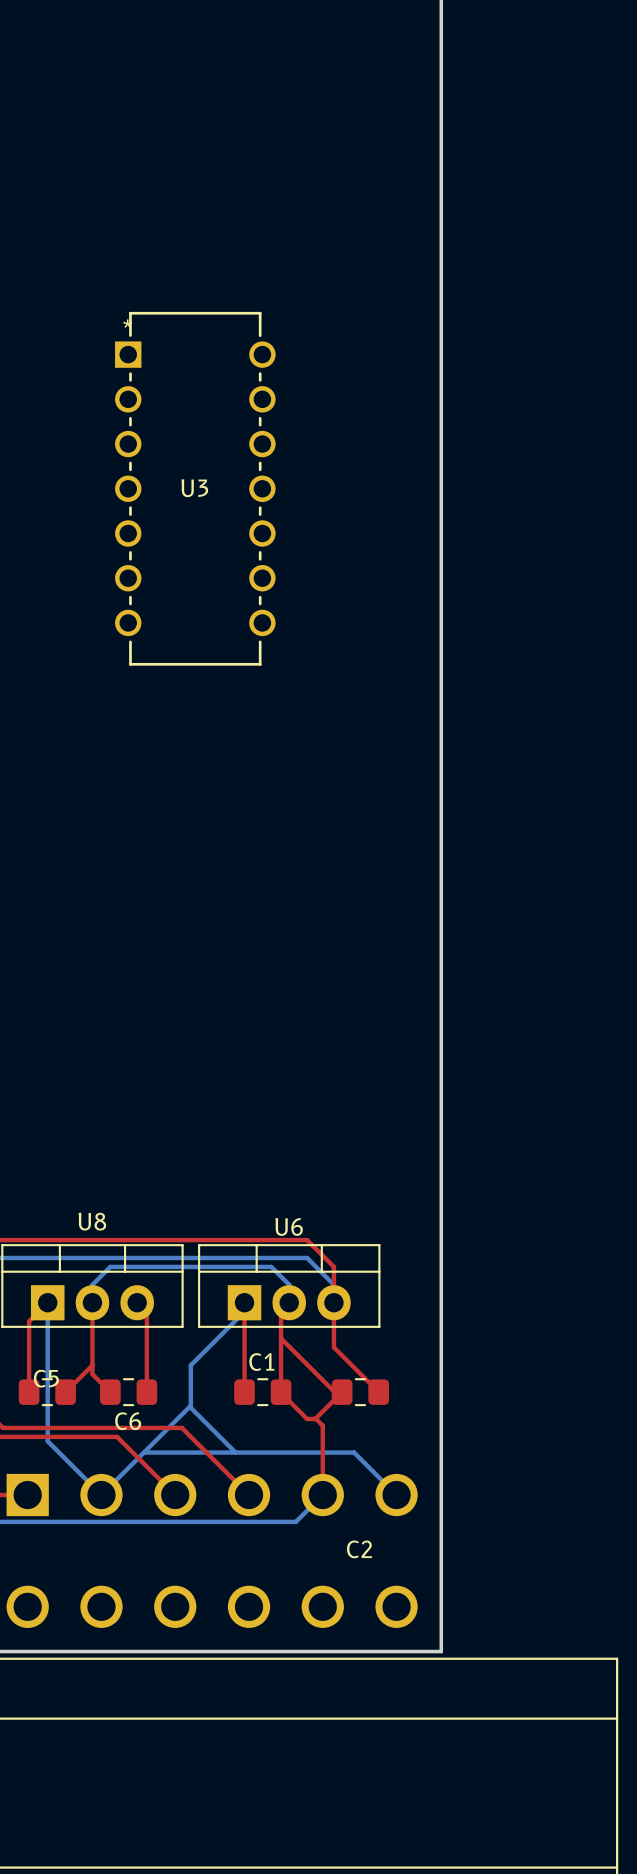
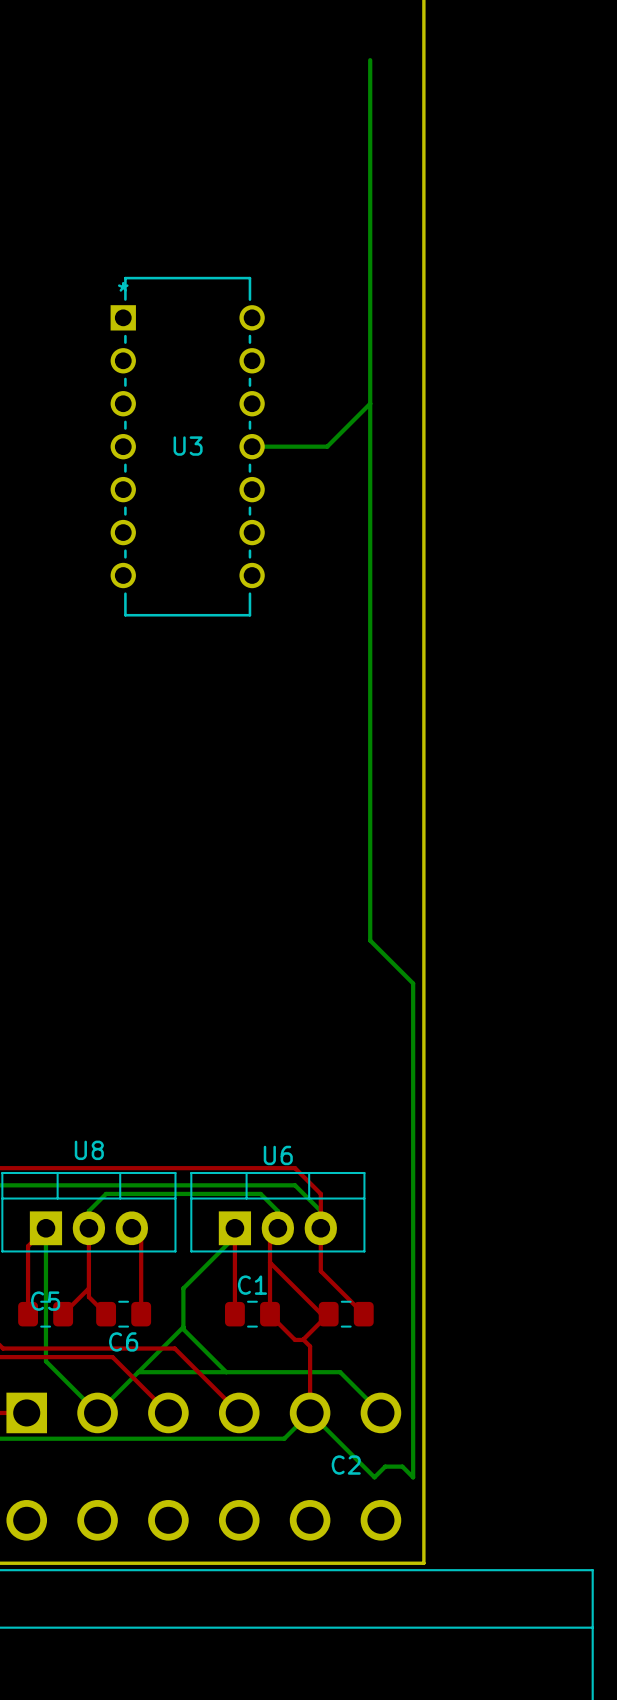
bottom track: none -> (370, 60) (370, 940) (413, 983) (413, 1477) (402, 1466) (385, 1466) (374, 1477) (310, 1412)
bottom track: none -> (370, 403) (327, 446) (252, 446)

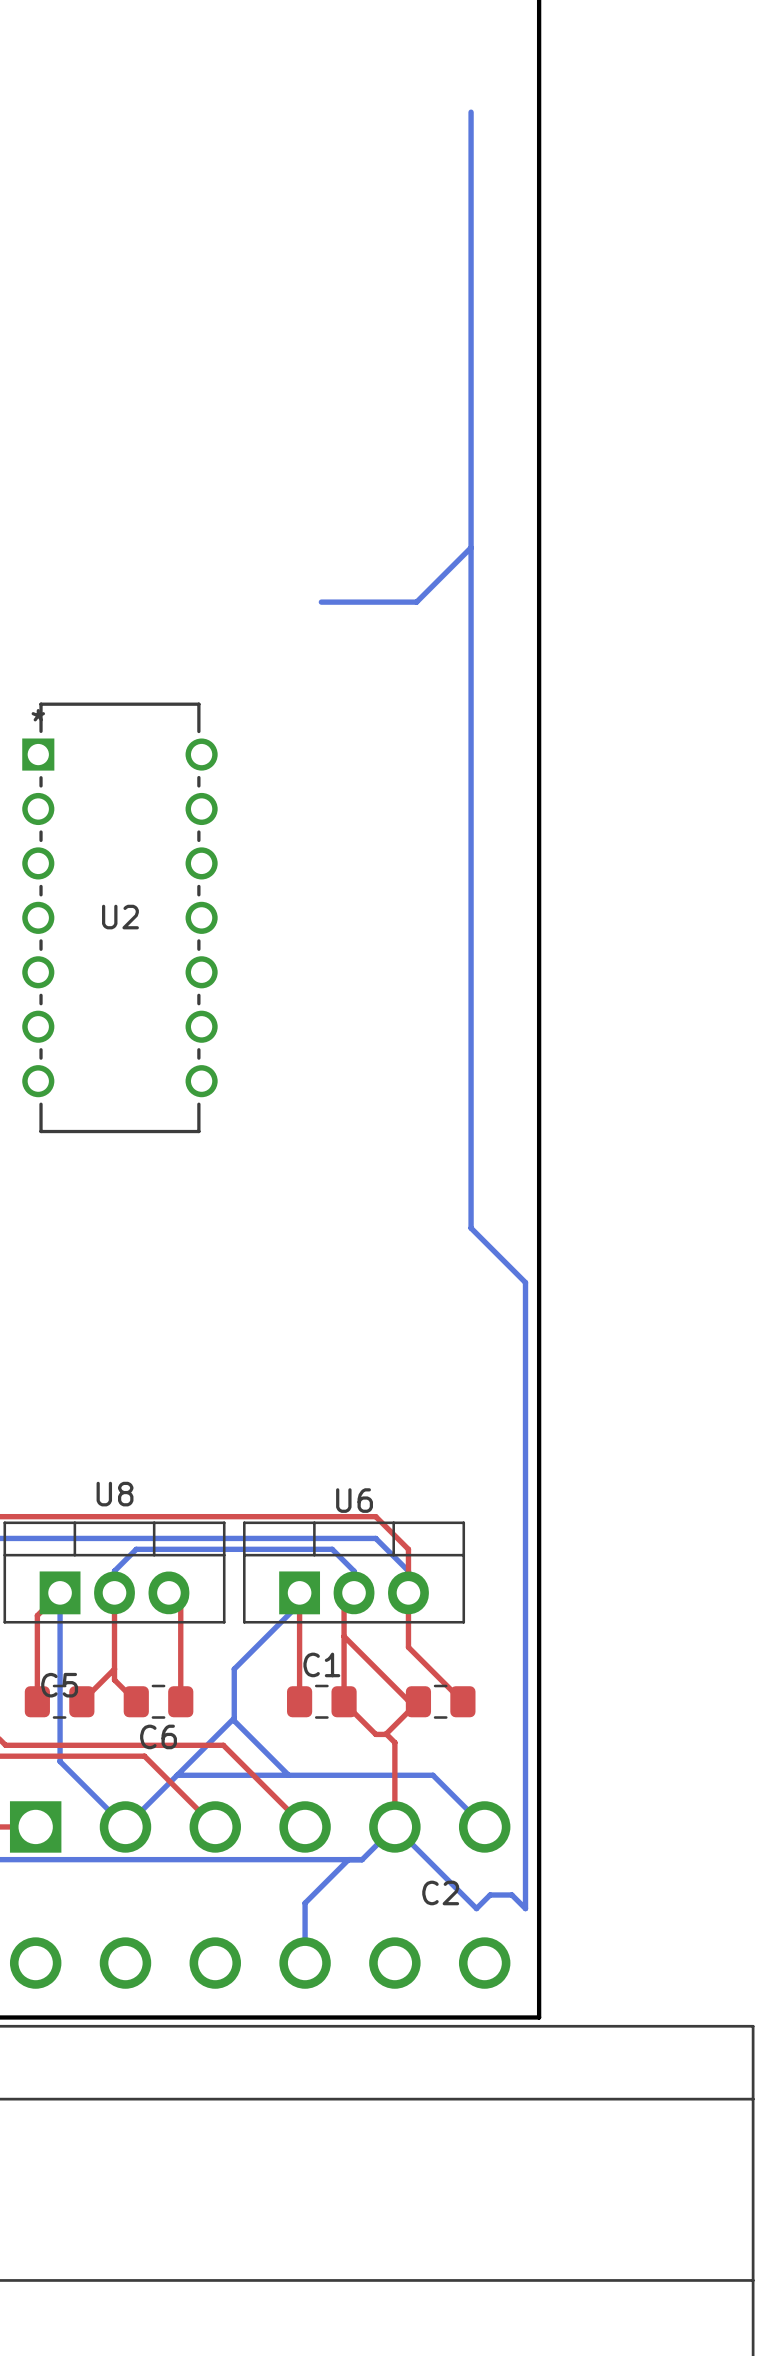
U3: (187, 446) -> none
U2: none -> (119, 917)
bottom track: none -> (348, 1859) (305, 1903) (305, 1963)

